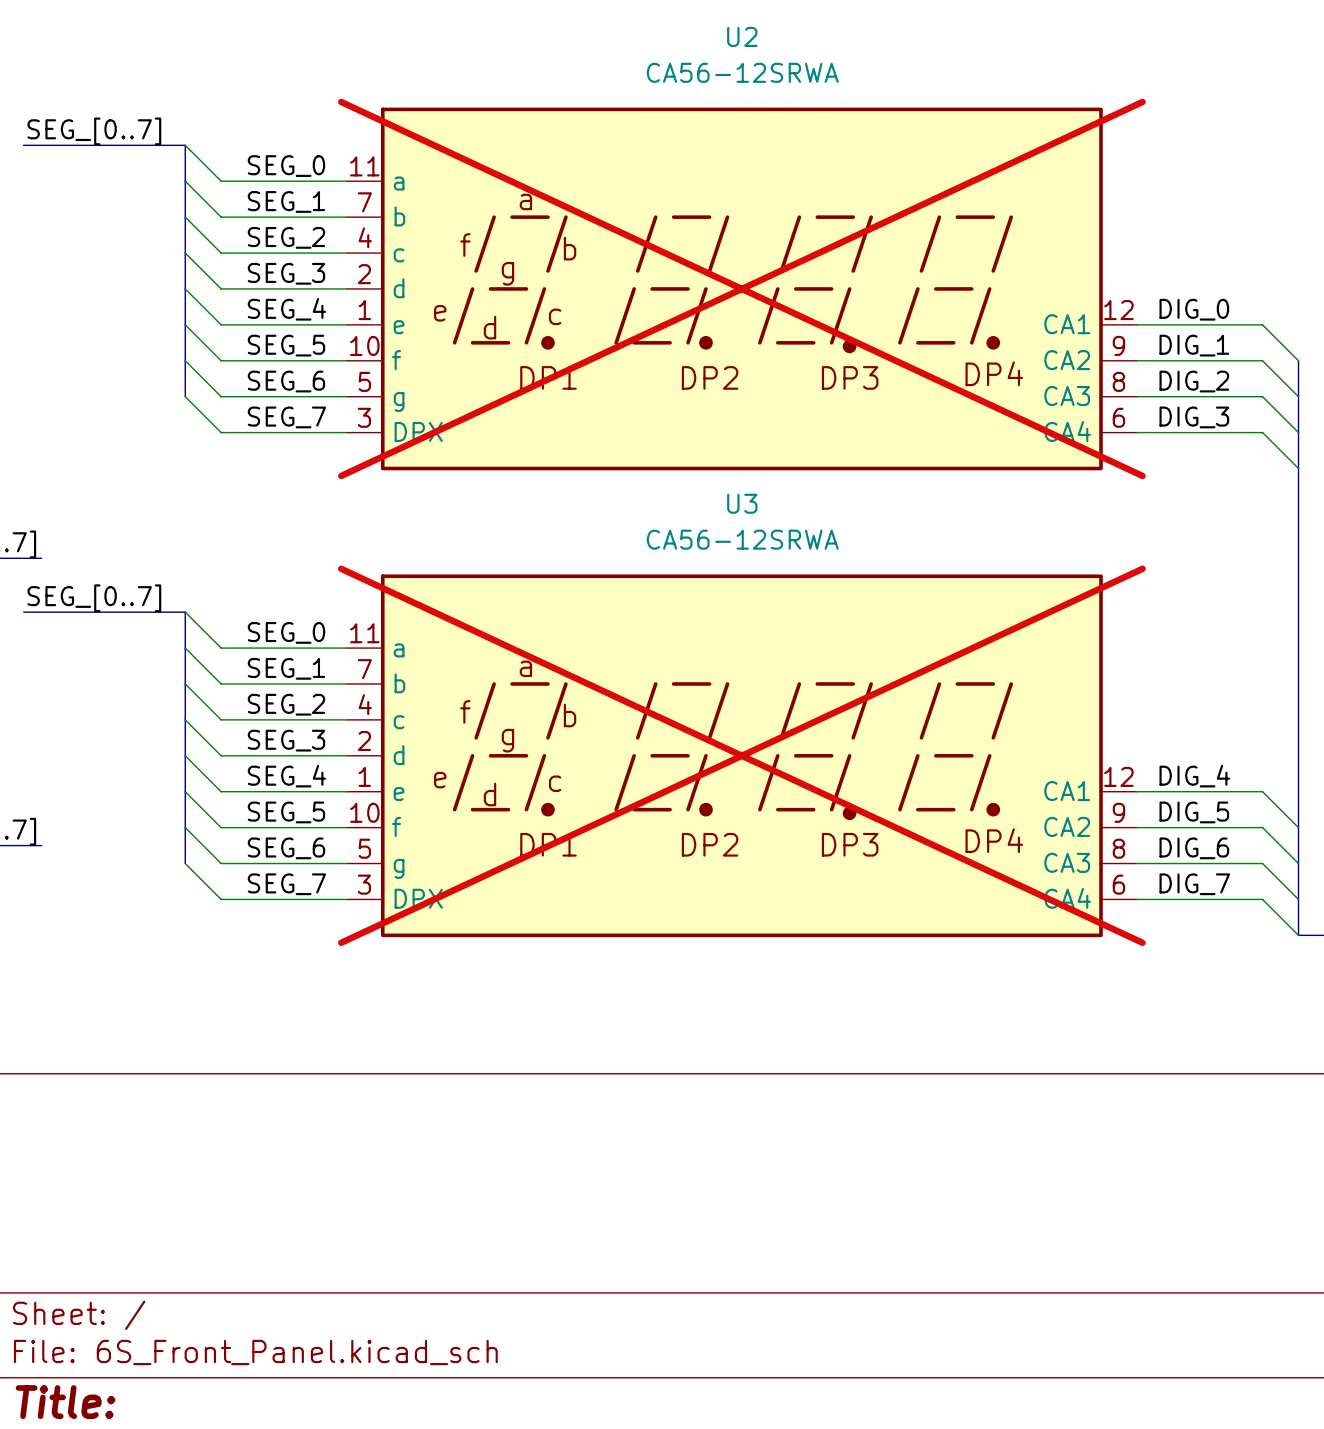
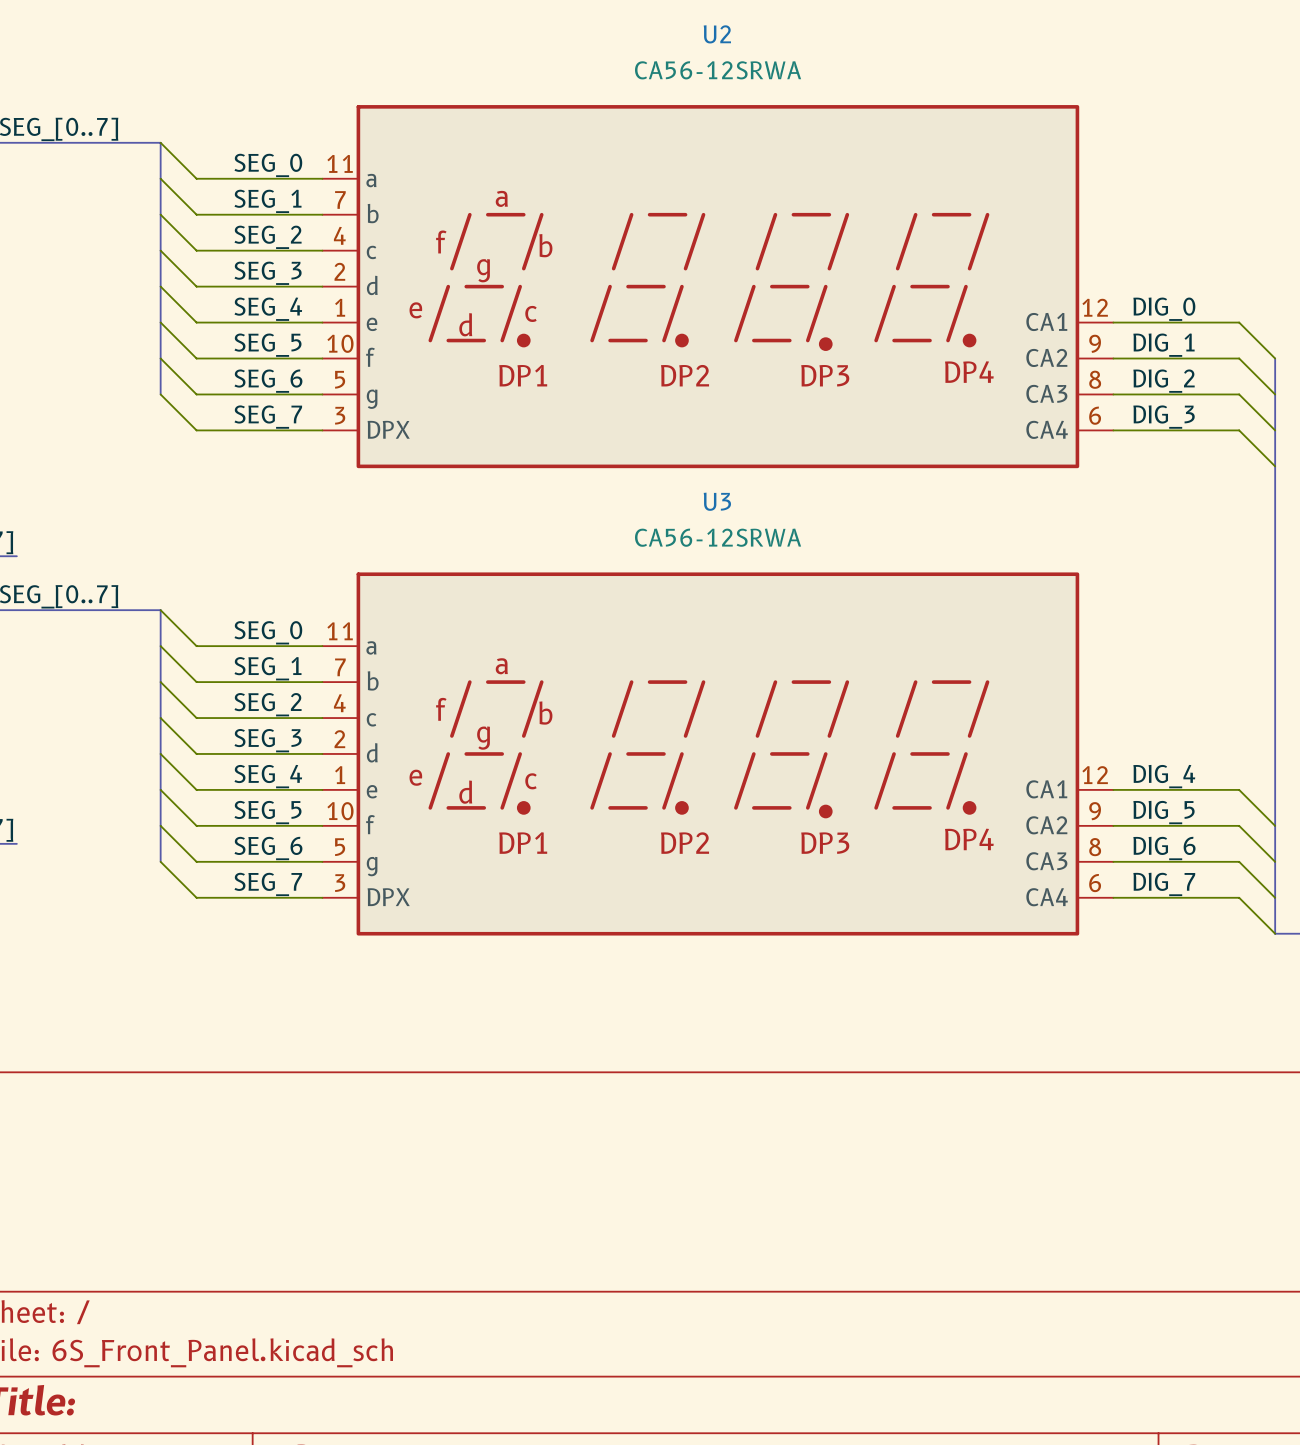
U2 do-not-place cross: (741, 288) -> none
U3 do-not-place cross: (741, 755) -> none

